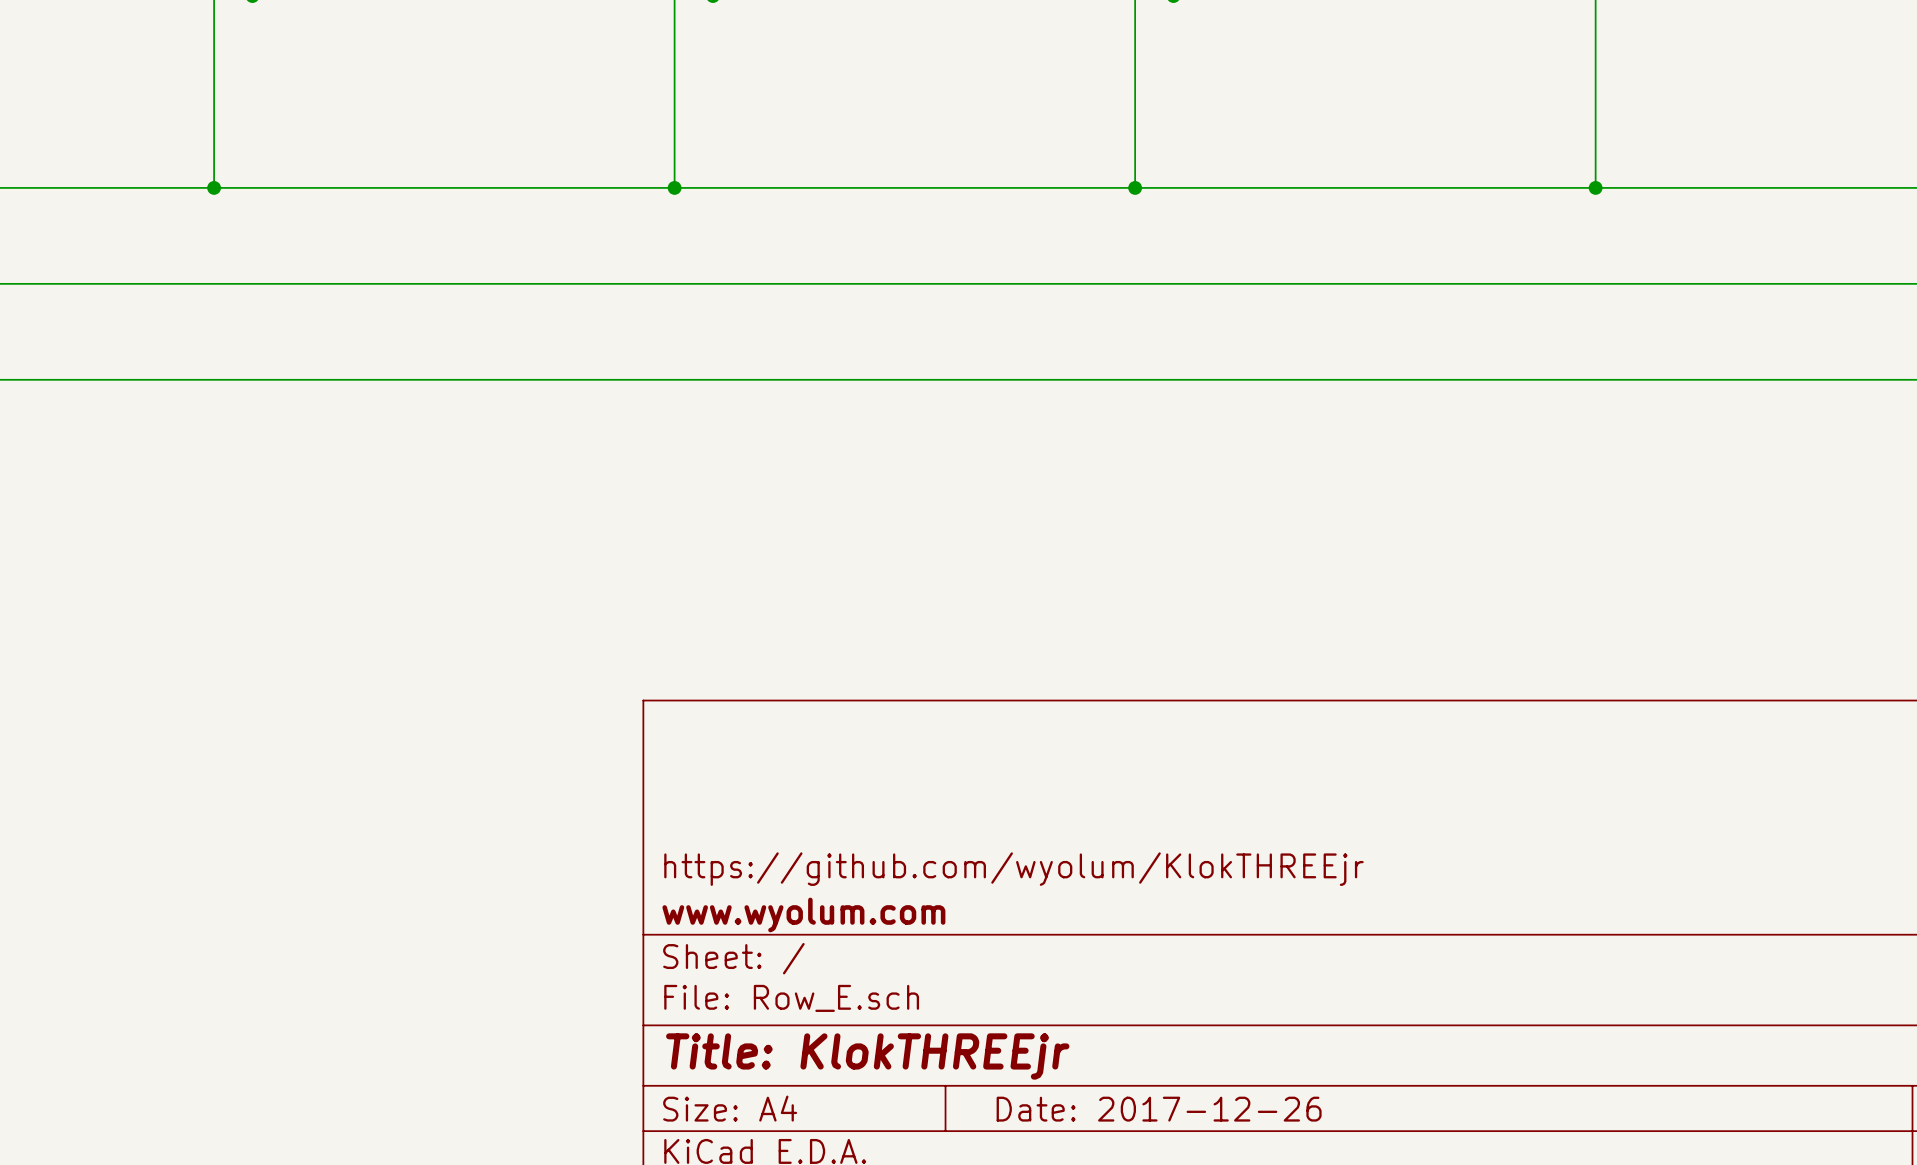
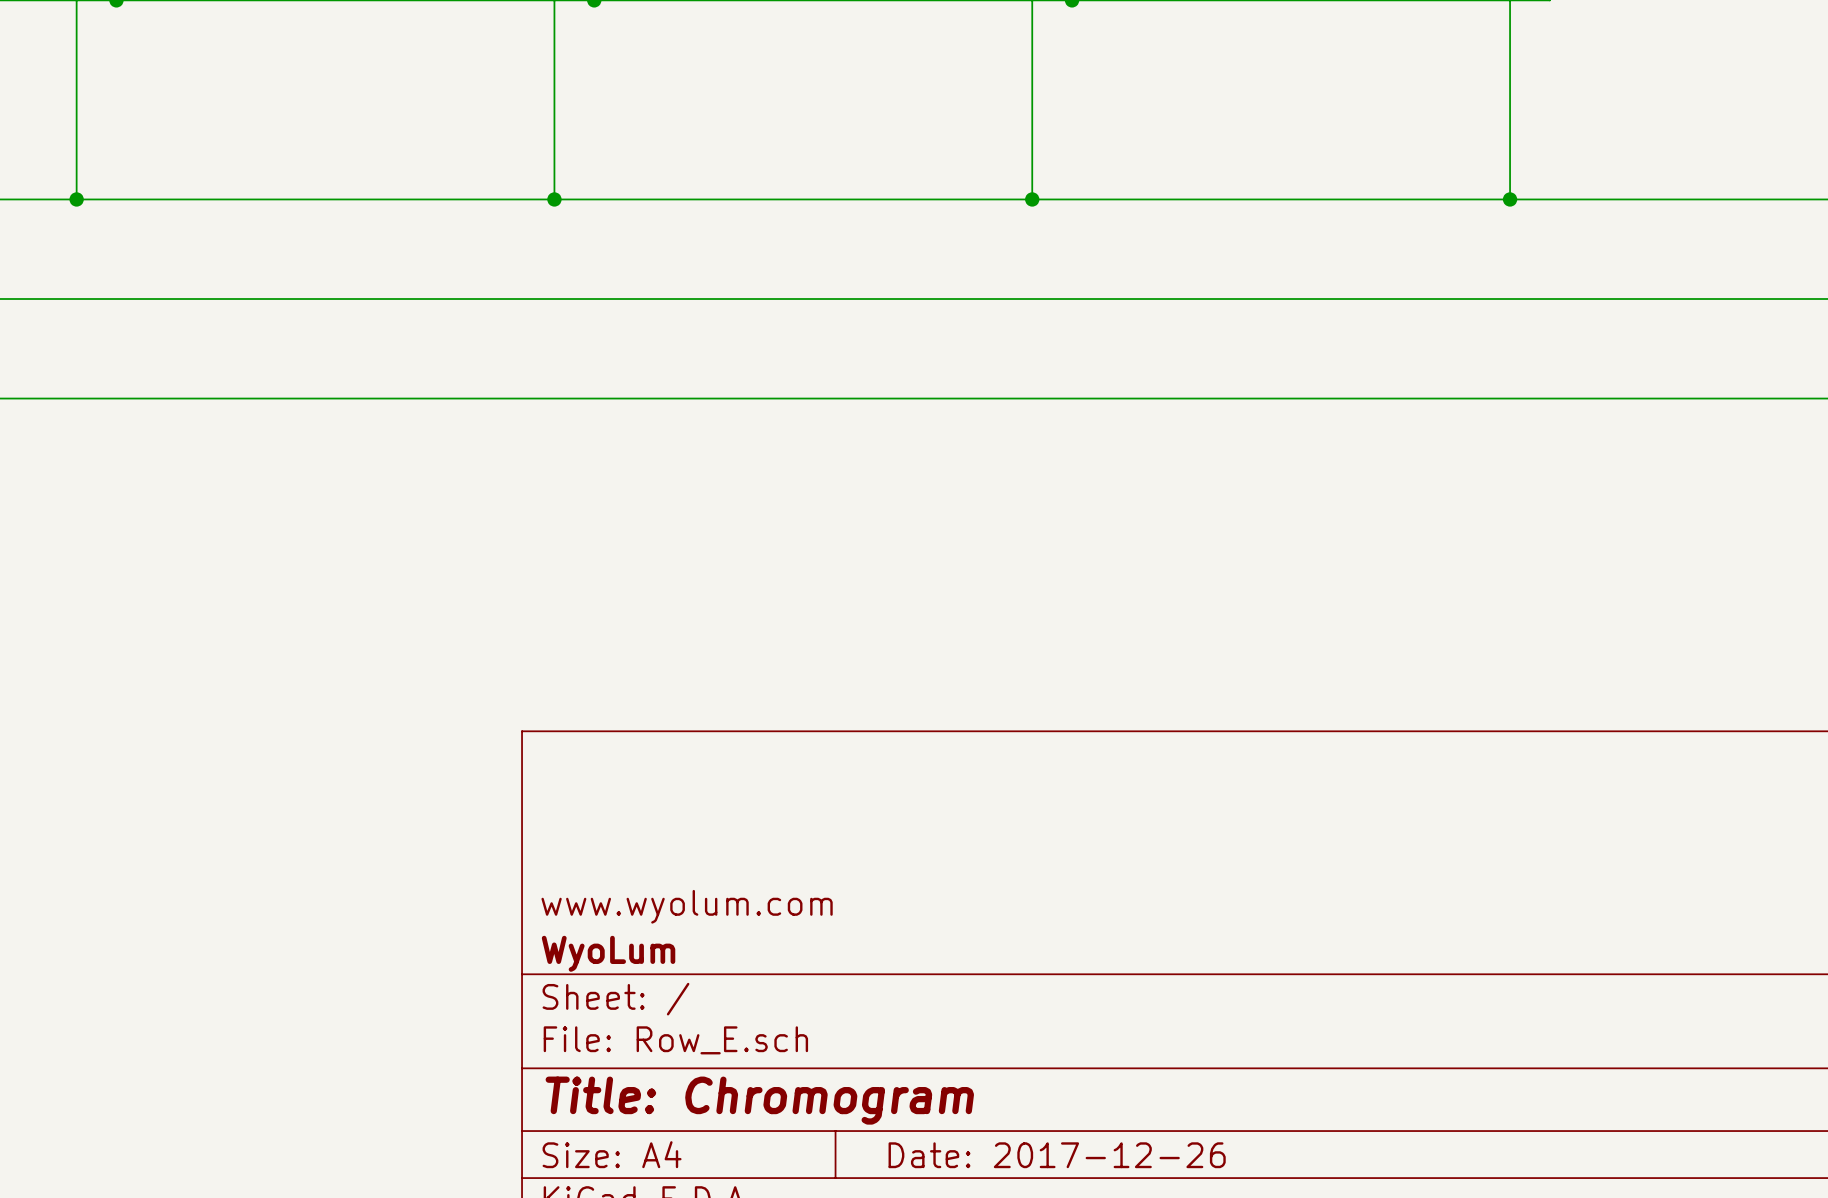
title block: https://github.com/wyolum/KlokTHREEjr (1013, 869) -> www.wyolum.com (687, 906)
title block: www.wyolum.com (803, 914) -> WyoLum (608, 953)
title block: Title: KlokTHREEjr (867, 1056) -> Title: Chromogram (759, 1100)

